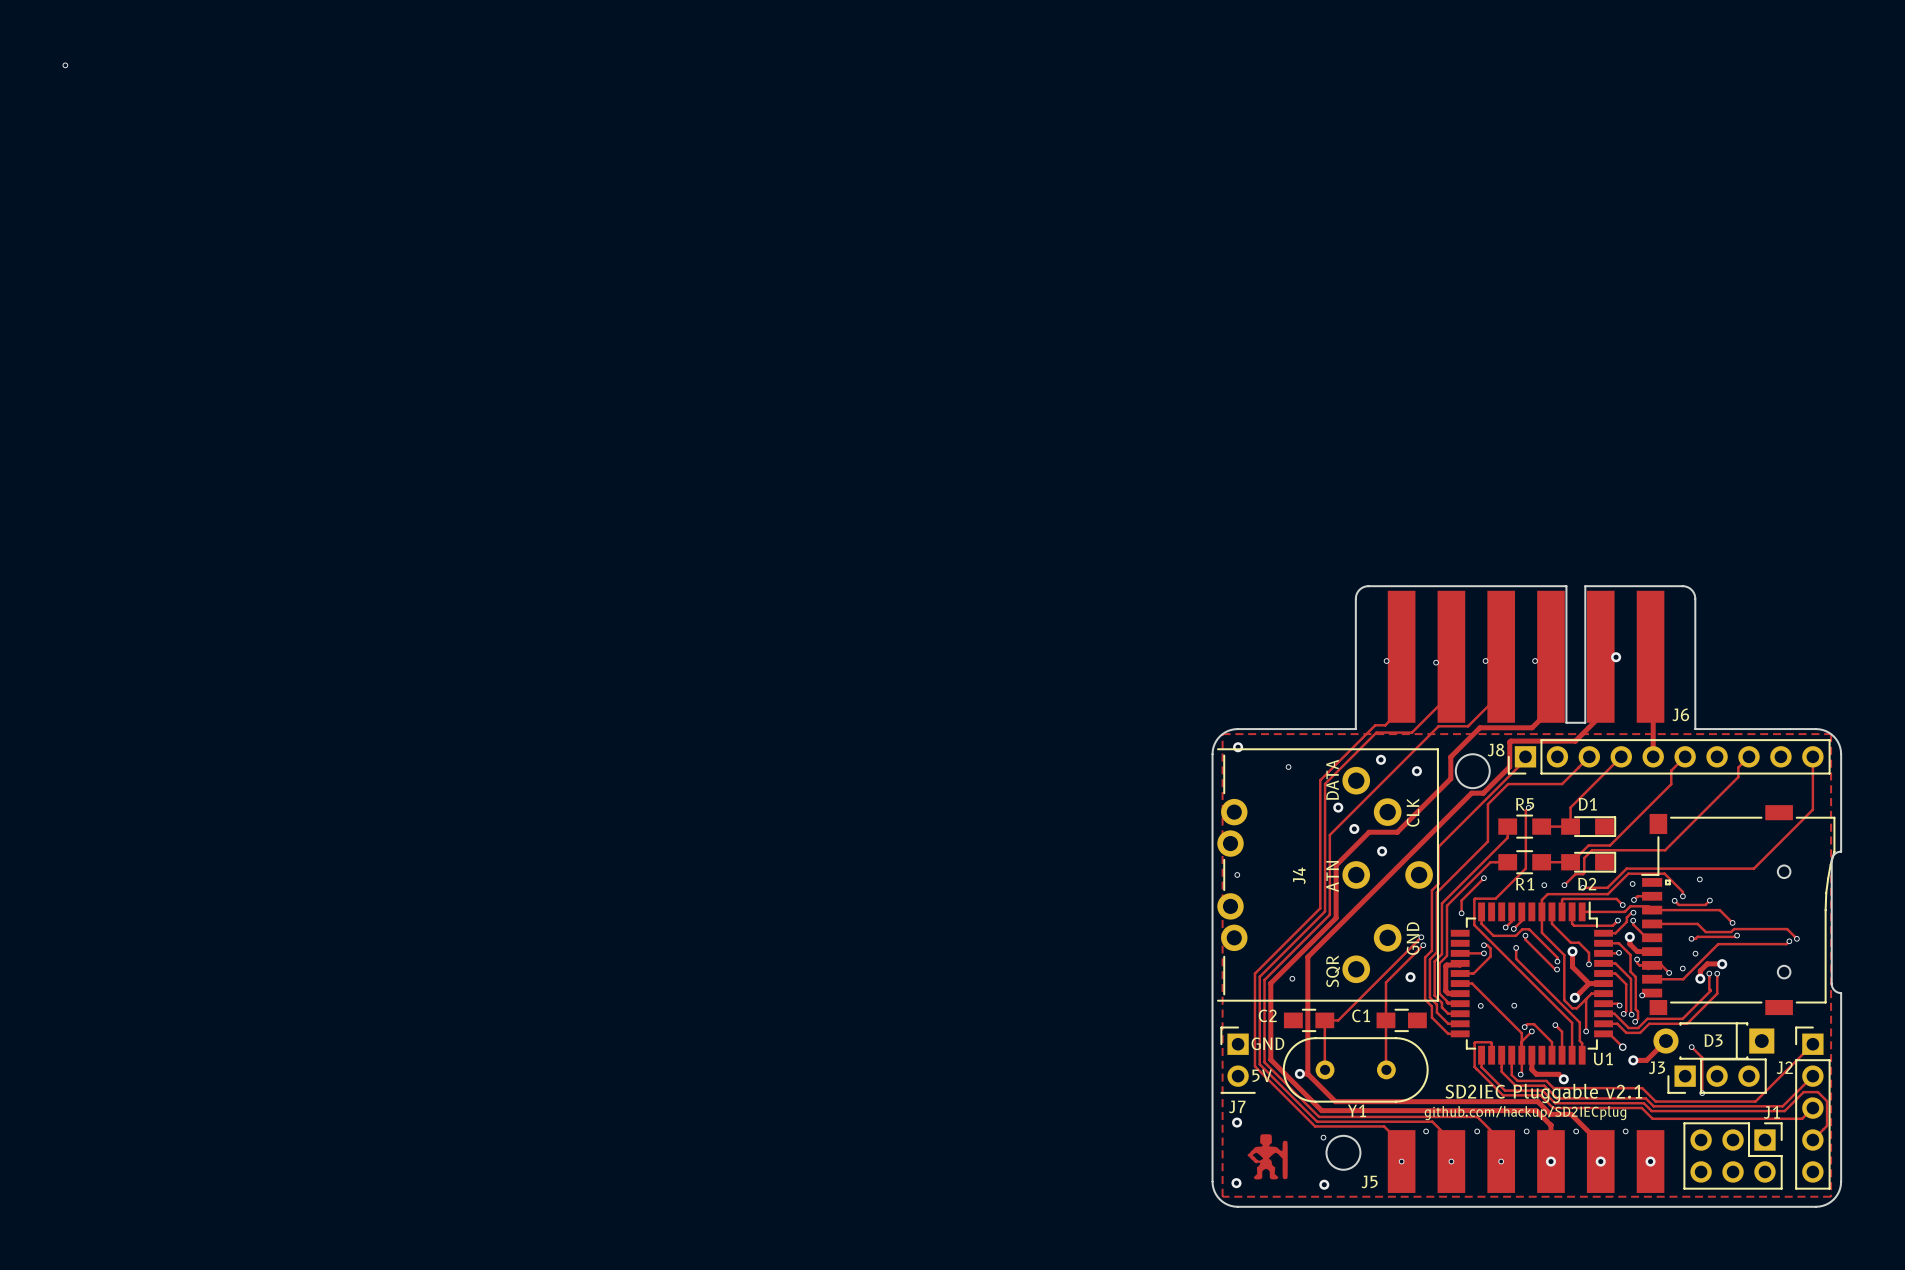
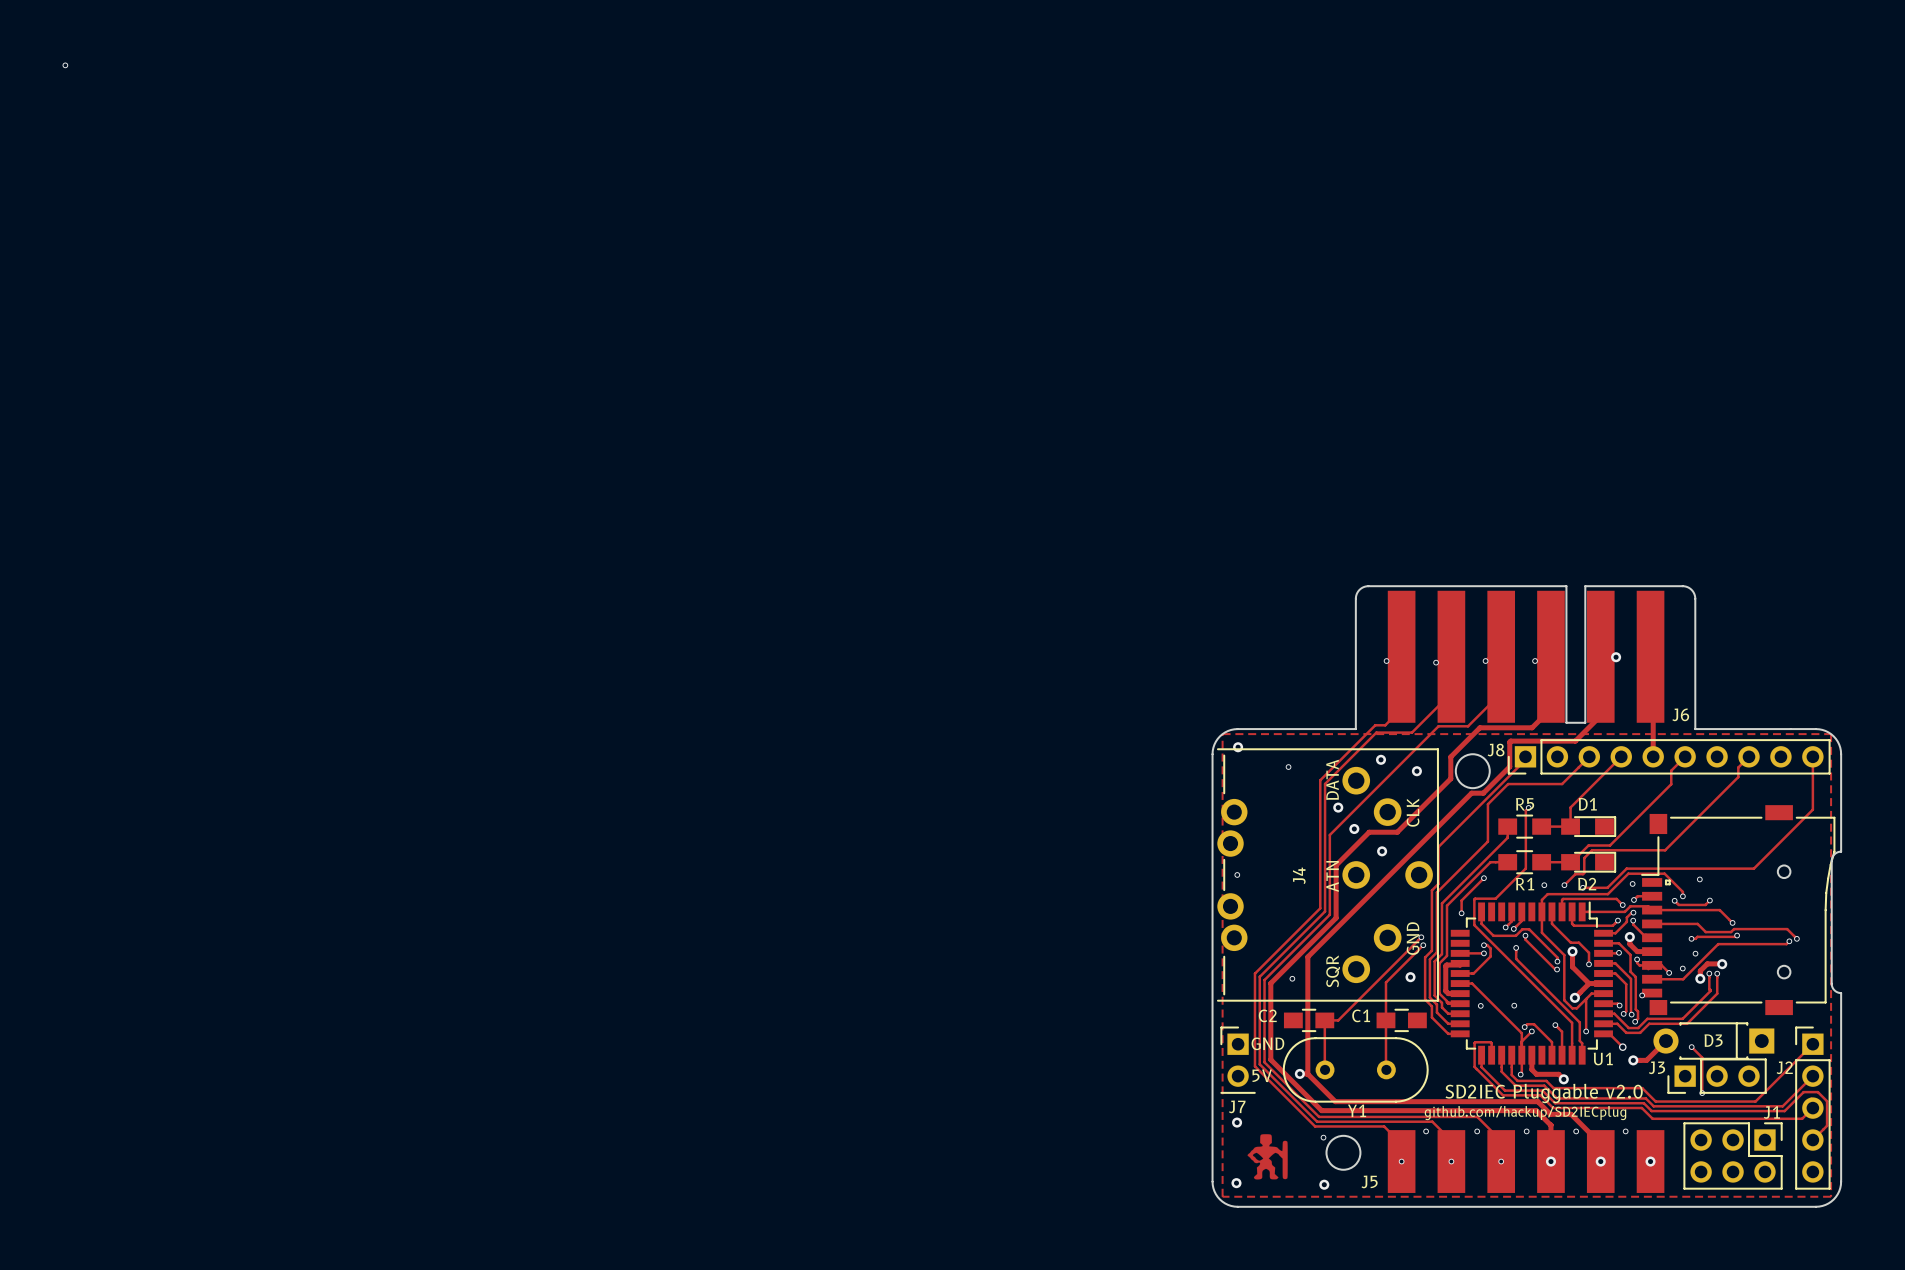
text: SD2IEC Pluggable v2.1 (1543, 1093) -> SD2IEC Pluggable v2.0 (1544, 1093)

